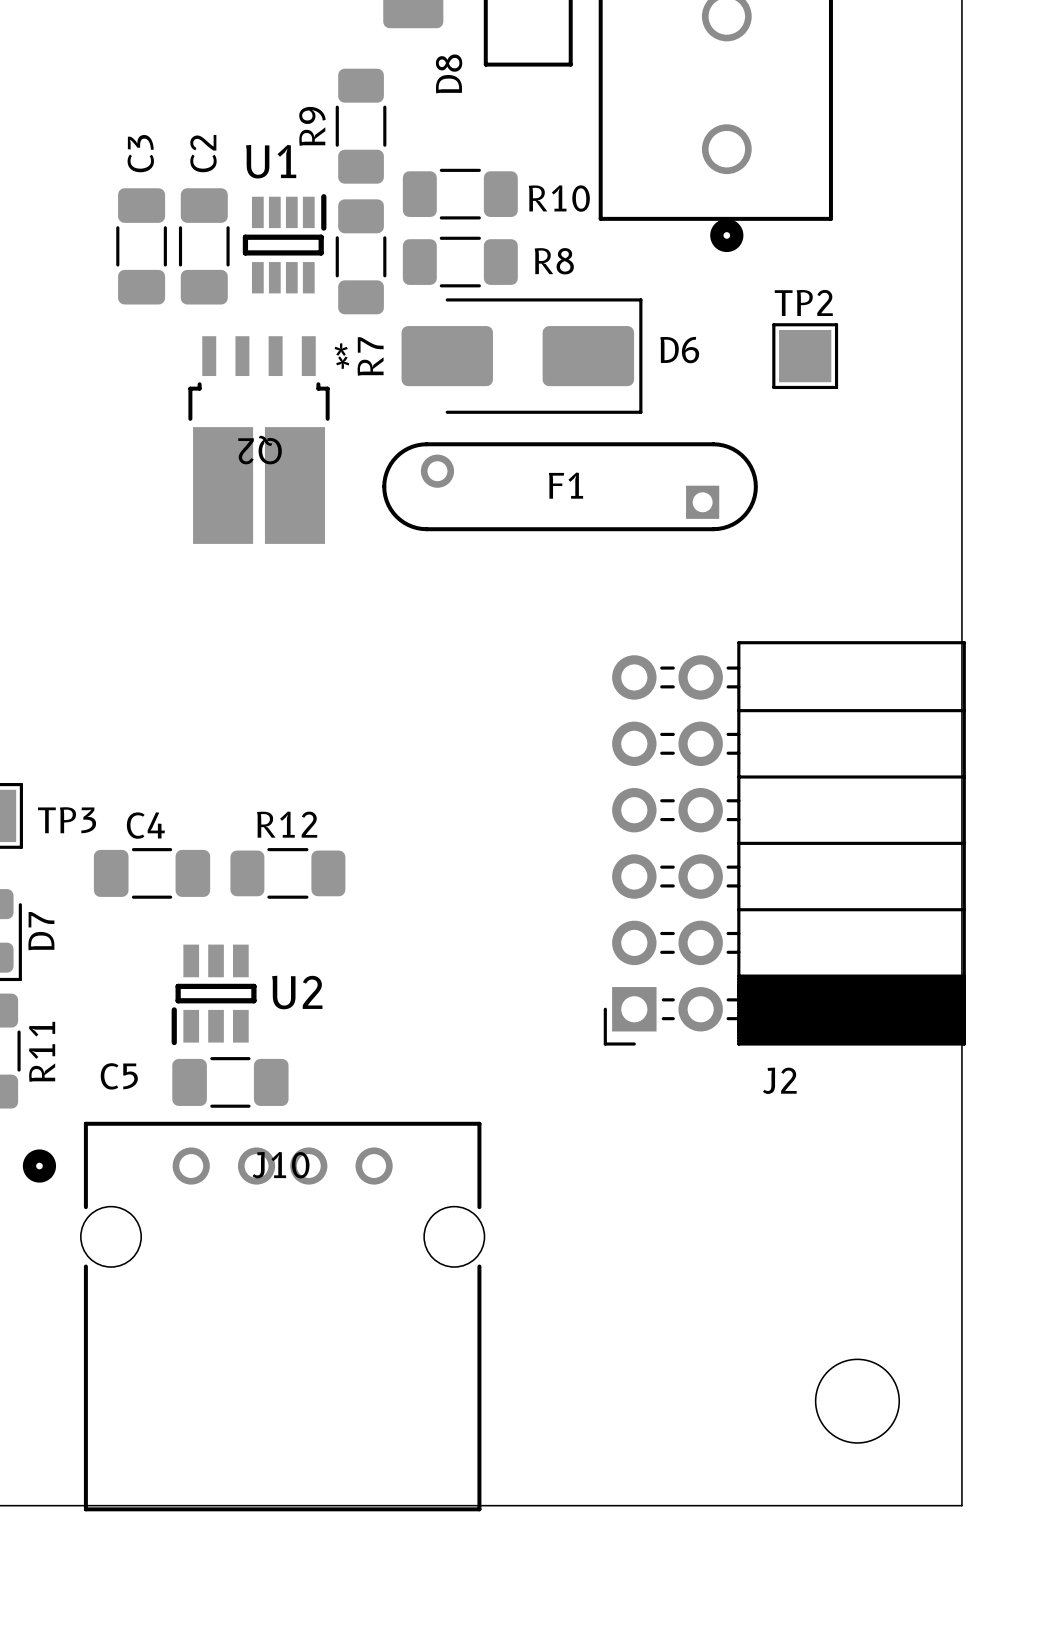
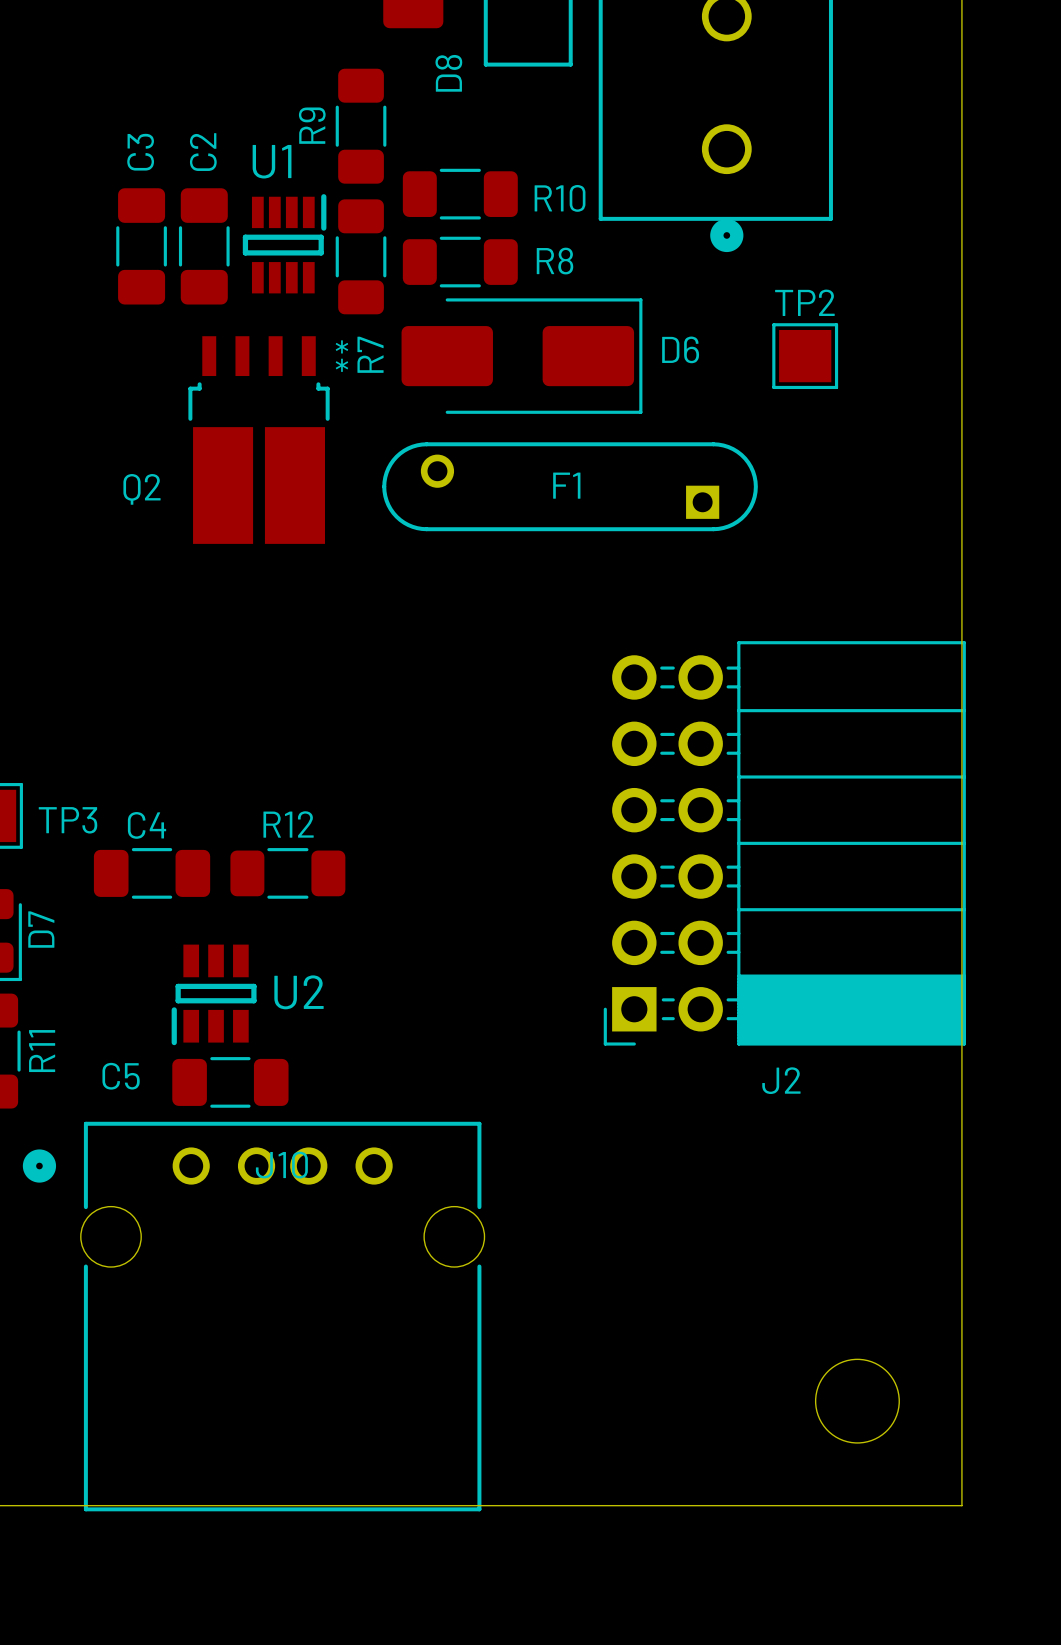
Q2 name rotation: 0° (260, 450) -> 180° (142, 489)
Q2 name position: Q2 (260, 450) -> Q2 (142, 489)

